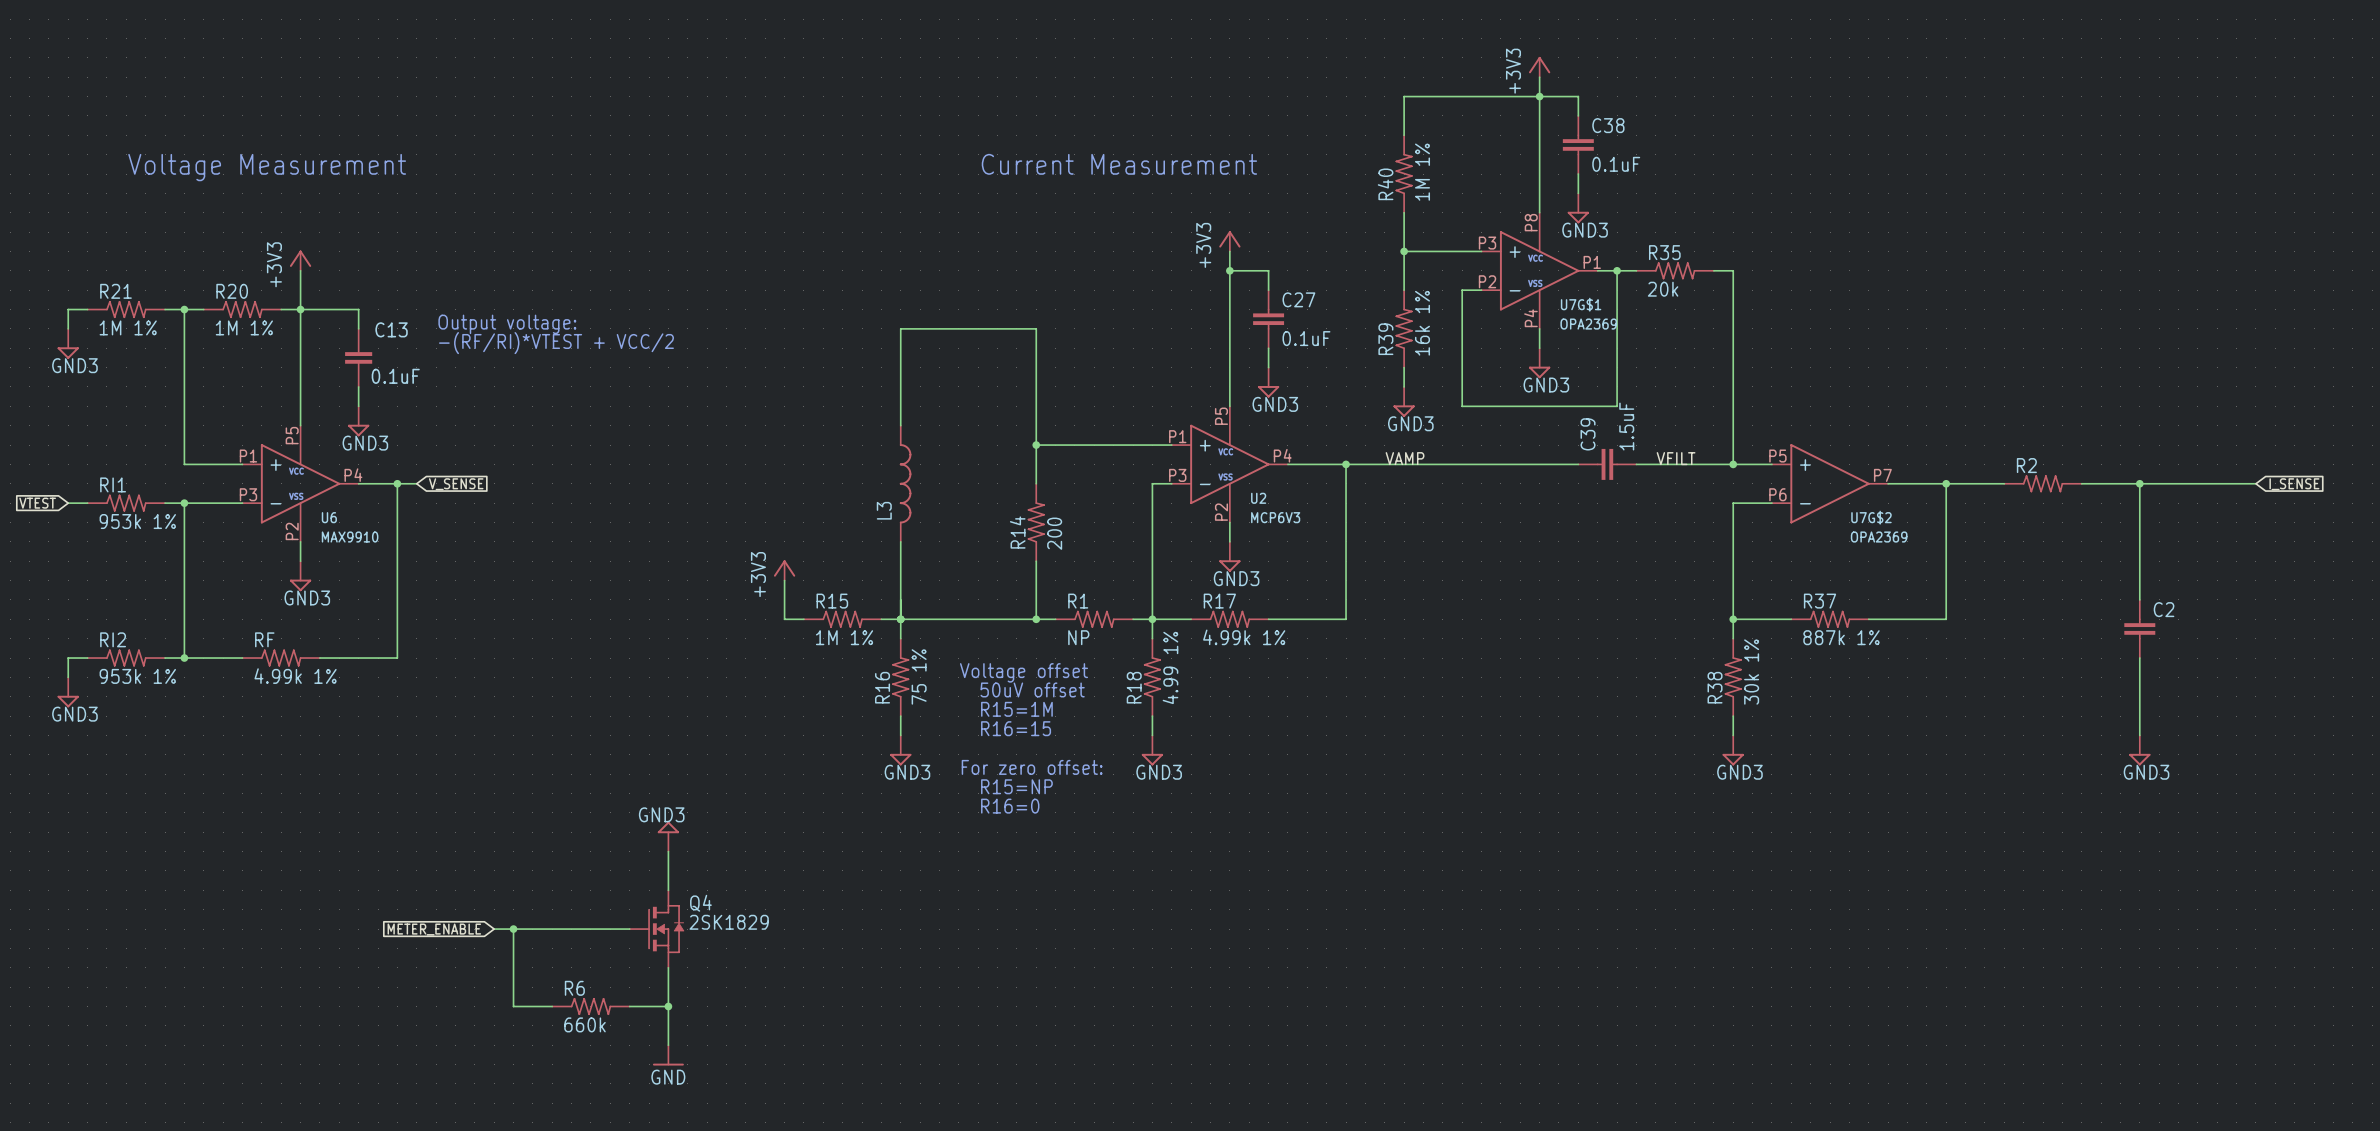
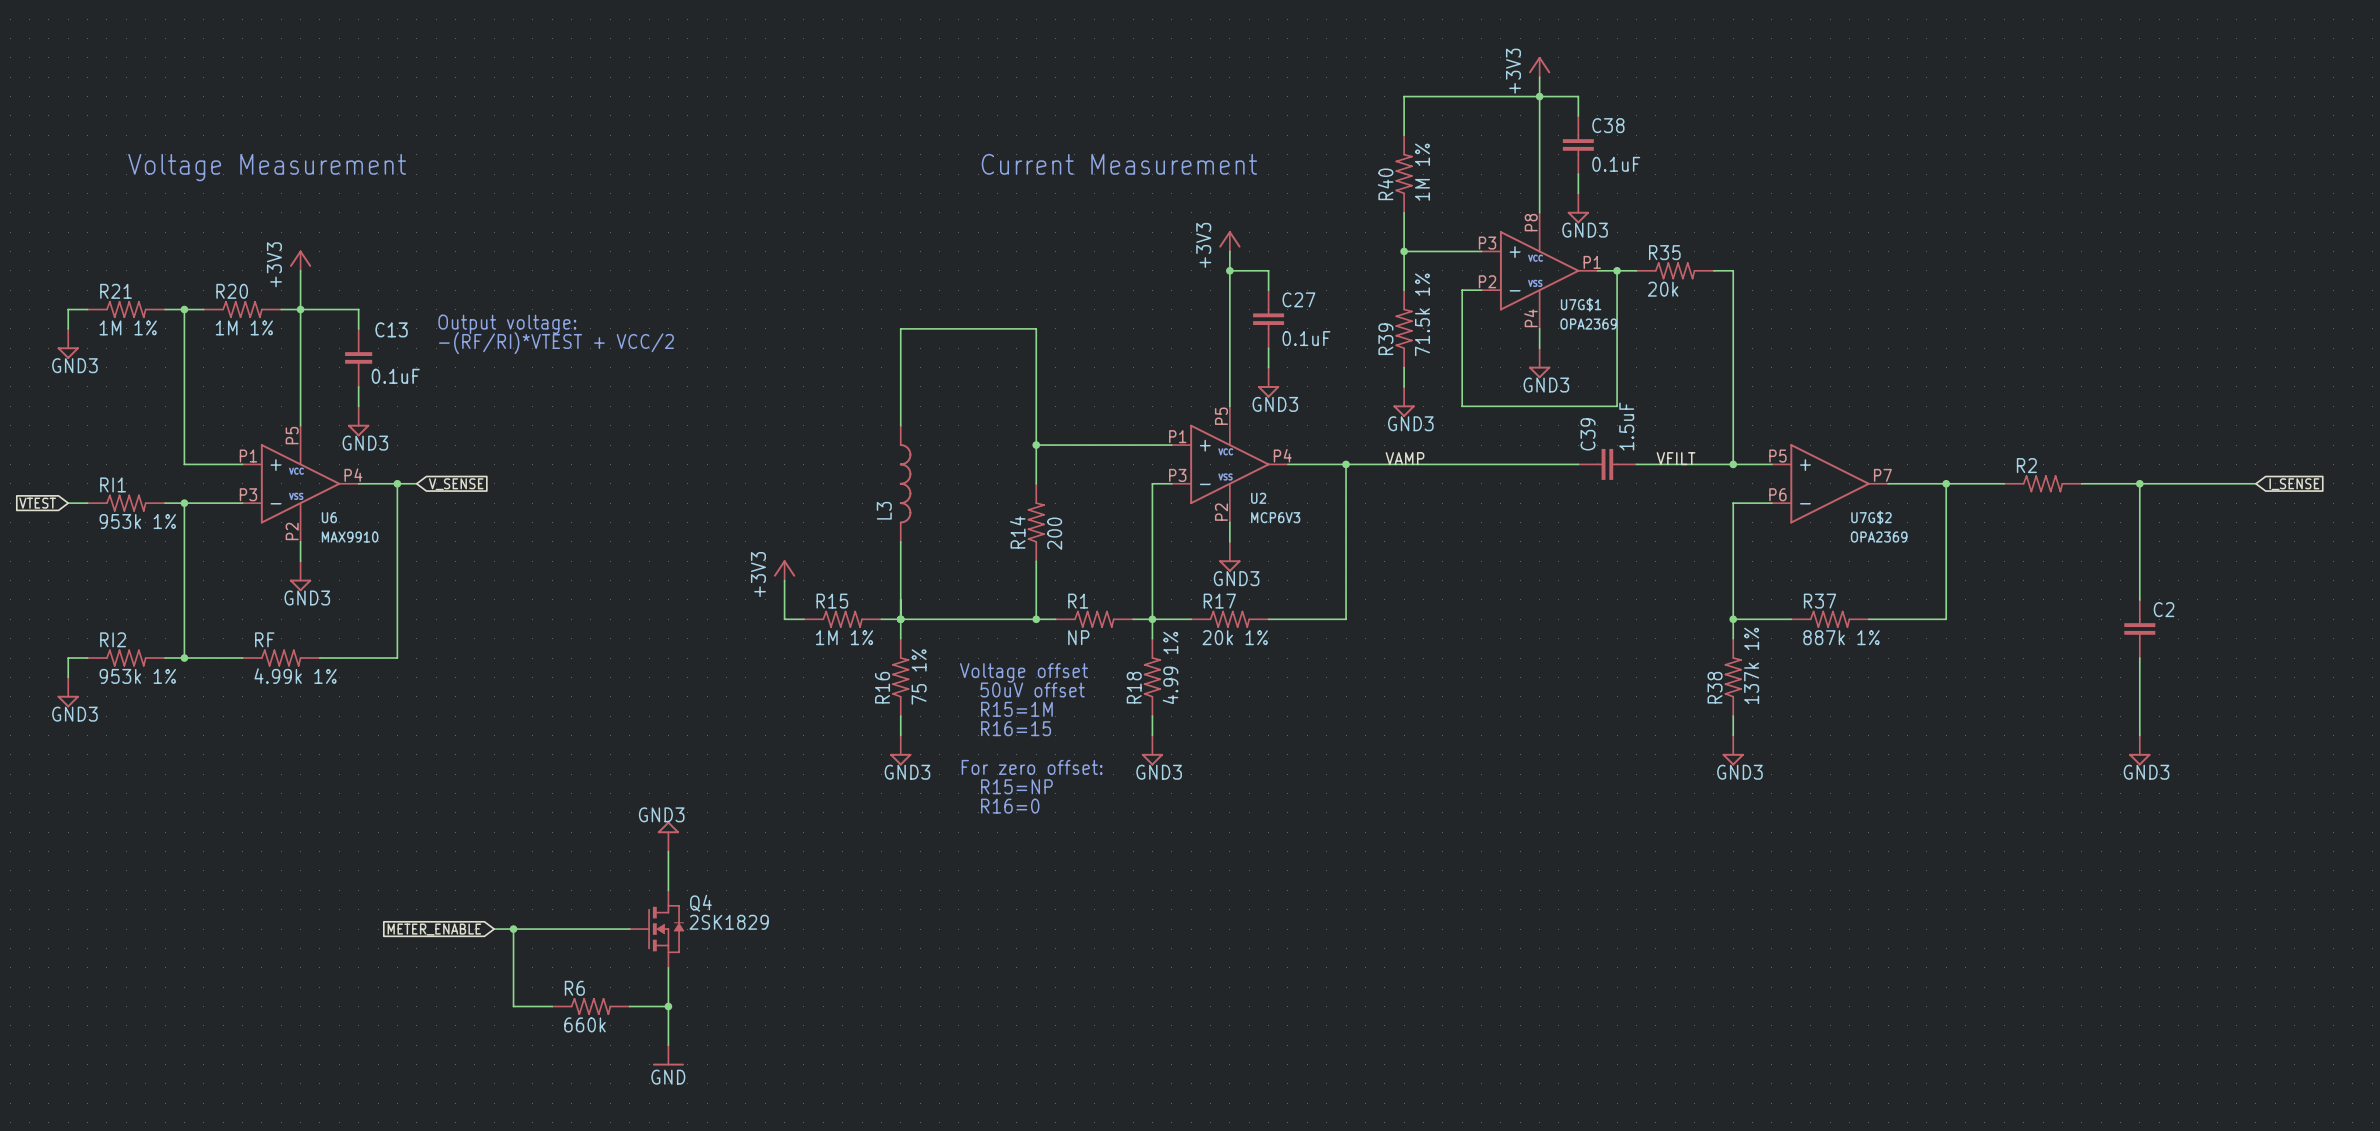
R39 value: 16k 1% (1422, 323) -> 71.5k 1% (1422, 314)
R17 value: 4.99k 1% (1244, 637) -> 20k 1% (1235, 637)
R38 value: 30k 1% (1751, 672) -> 137k 1% (1751, 665)

